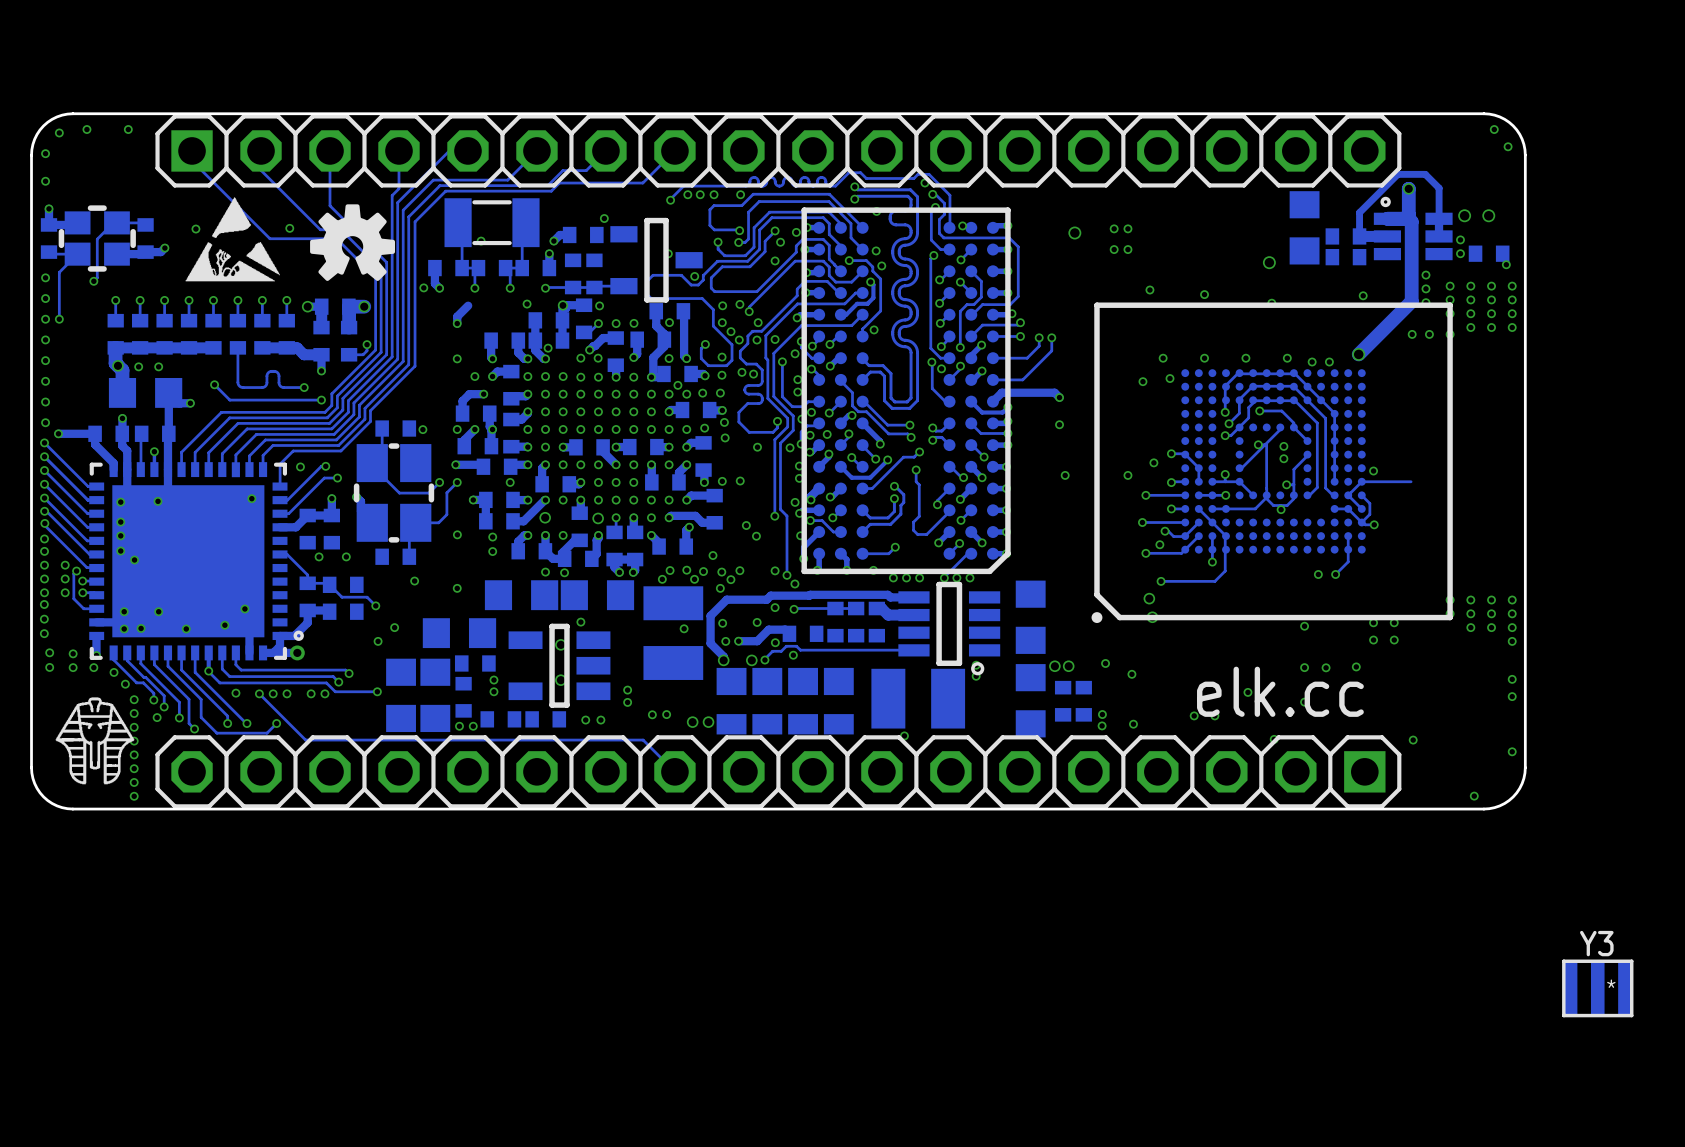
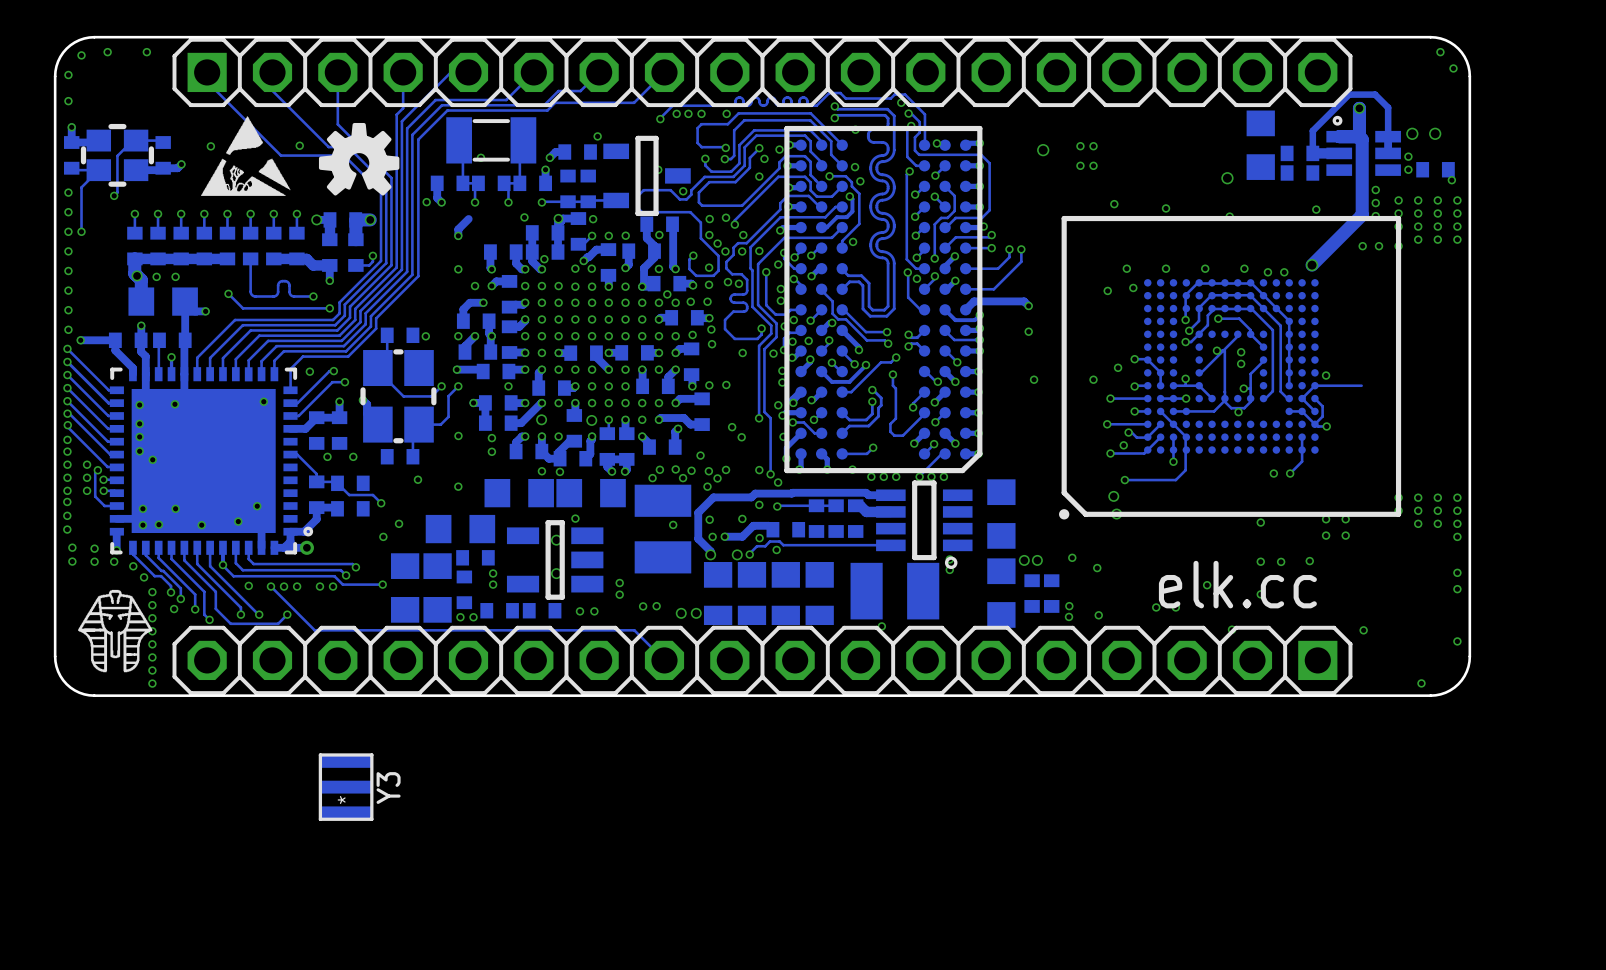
Y3 name position: Y3 (1596, 943) -> Y3 (388, 788)
Y3 footprint: [1562, 959, 1634, 1018] -> [318, 753, 374, 821]

